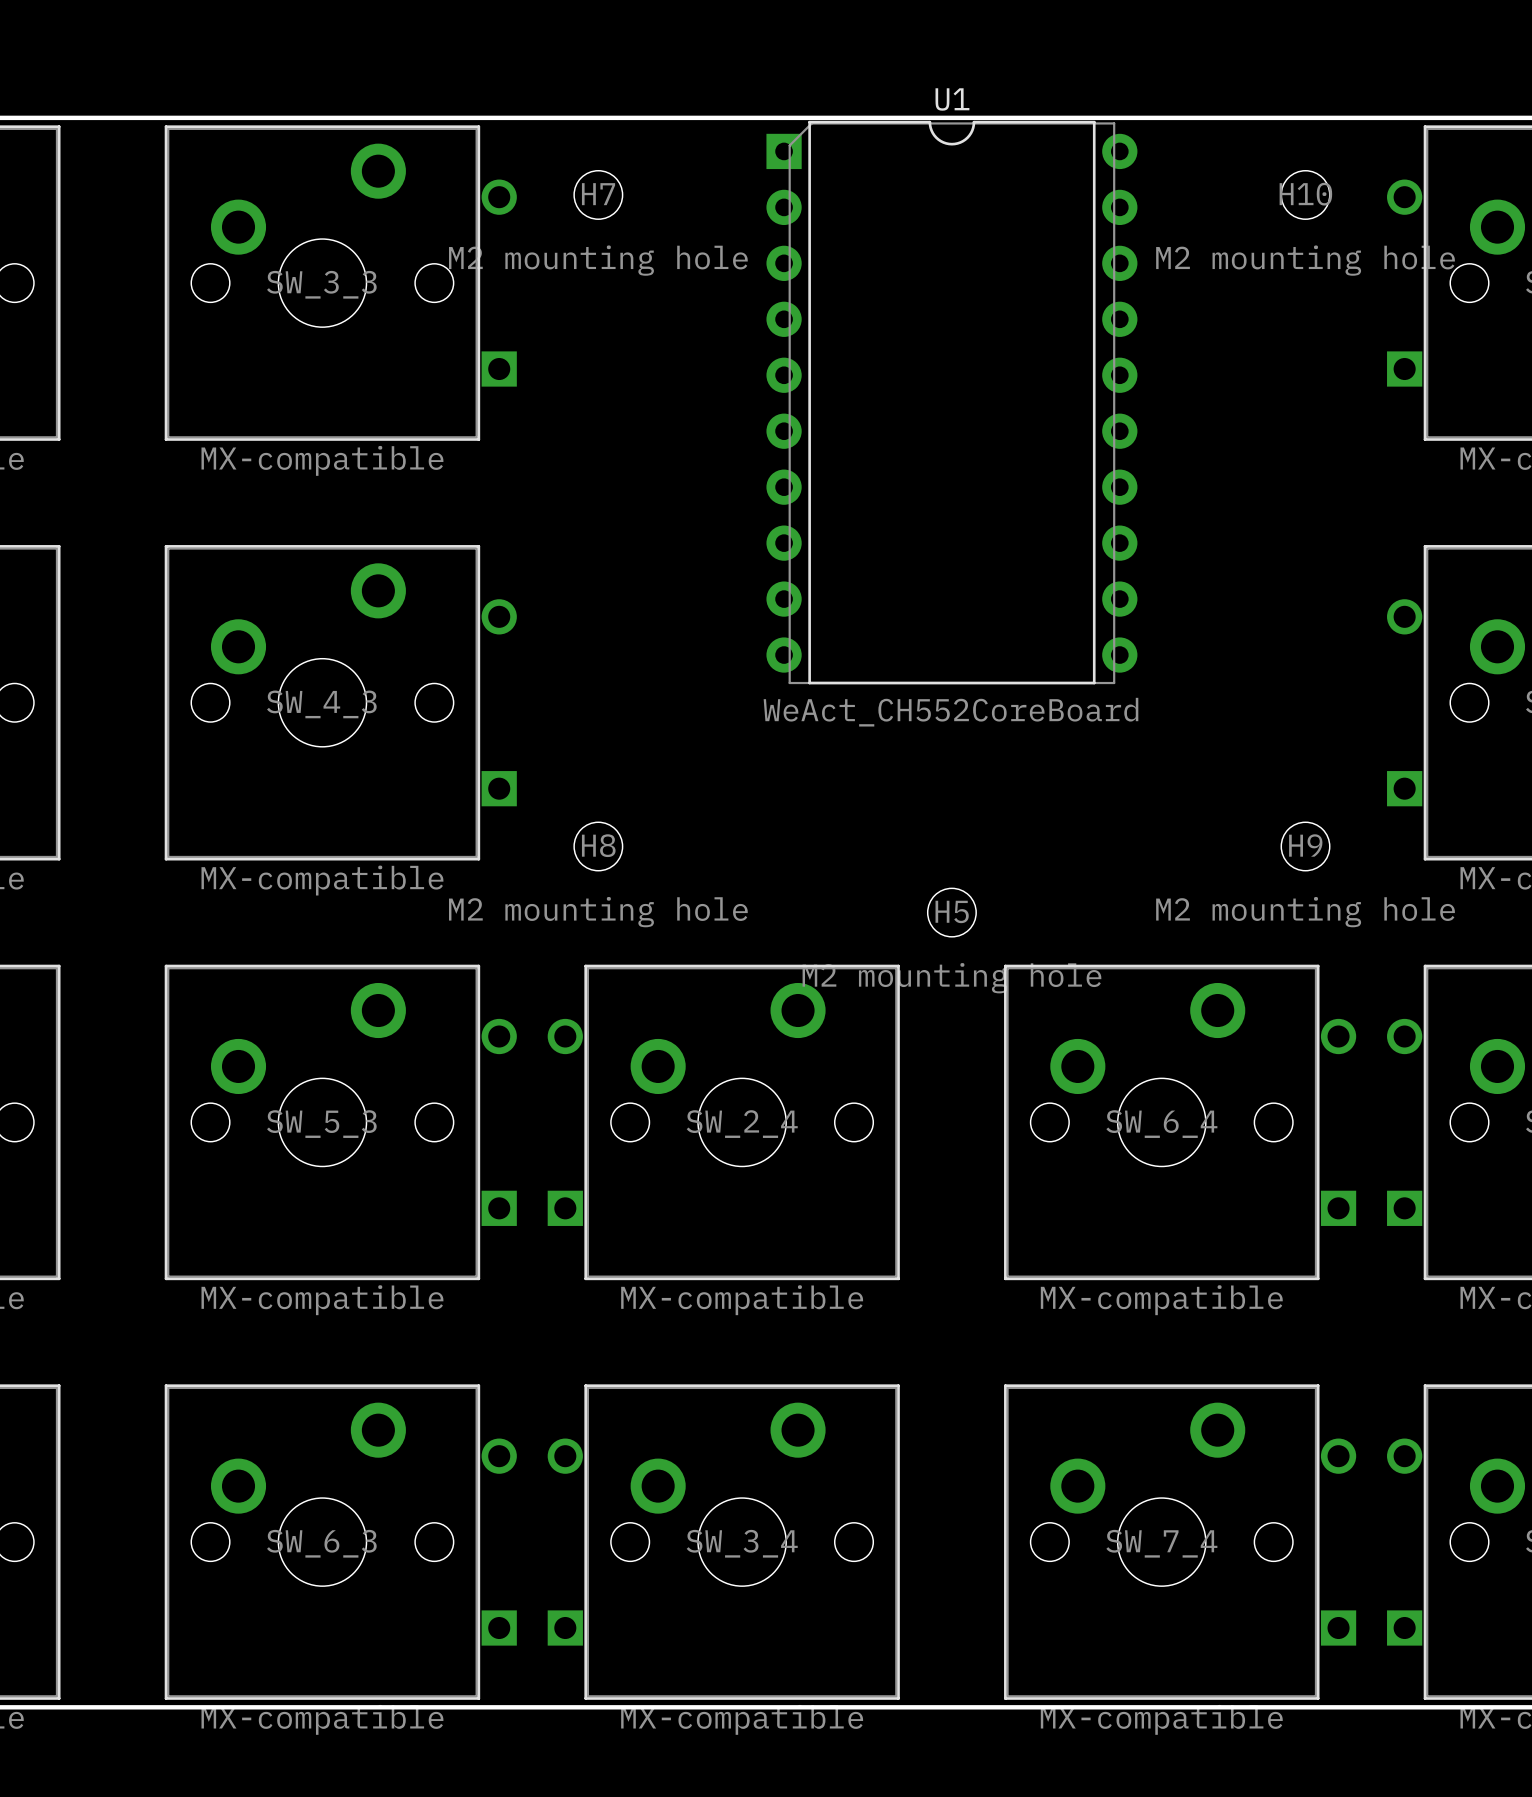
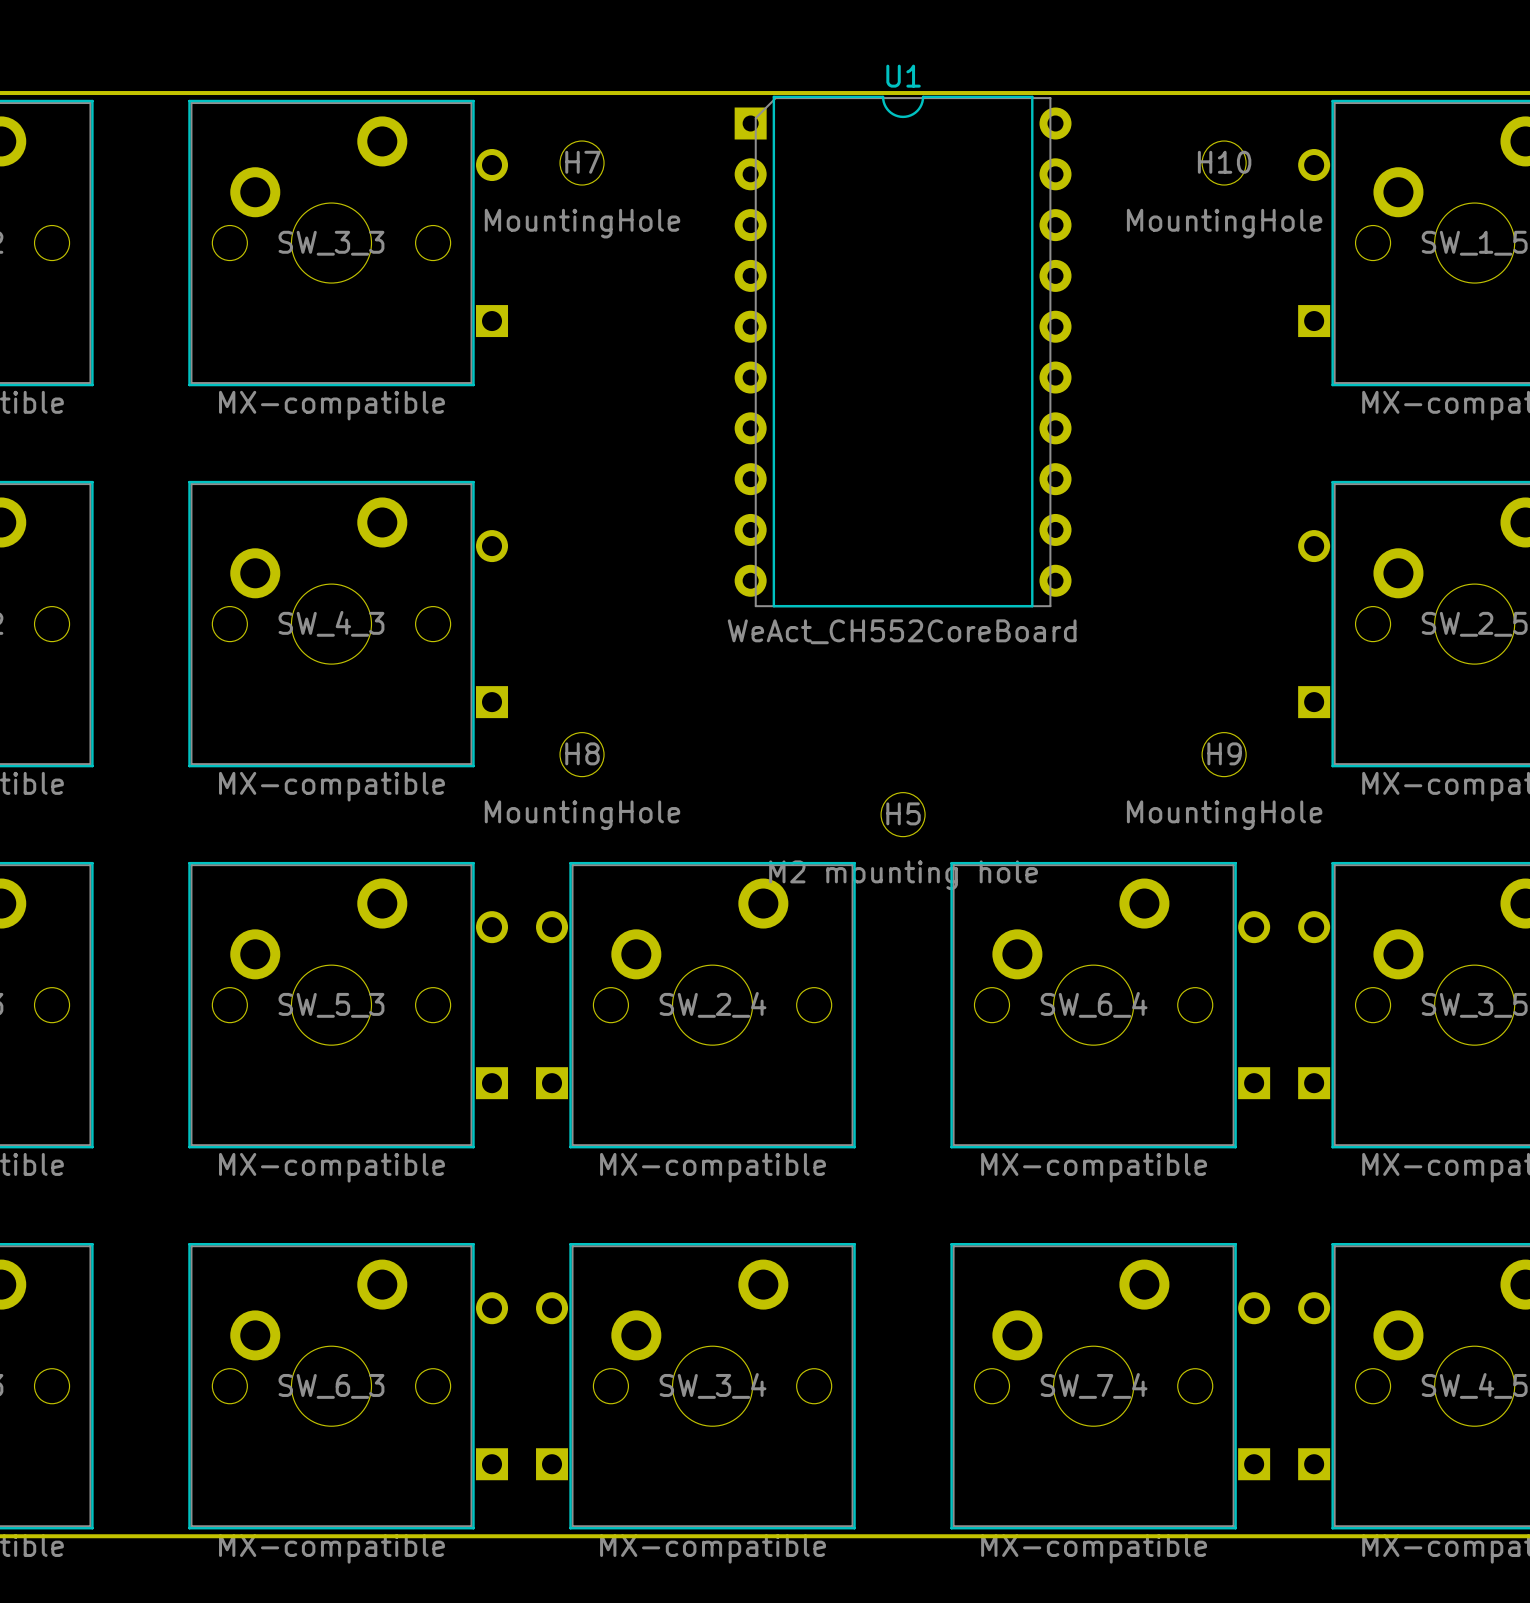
H7 value: M2 mounting hole (598, 260) -> MountingHole (582, 223)
H10 value: M2 mounting hole (1305, 260) -> MountingHole (1224, 223)
H8 value: M2 mounting hole (598, 912) -> MountingHole (582, 815)
H9 value: M2 mounting hole (1305, 912) -> MountingHole (1224, 815)

